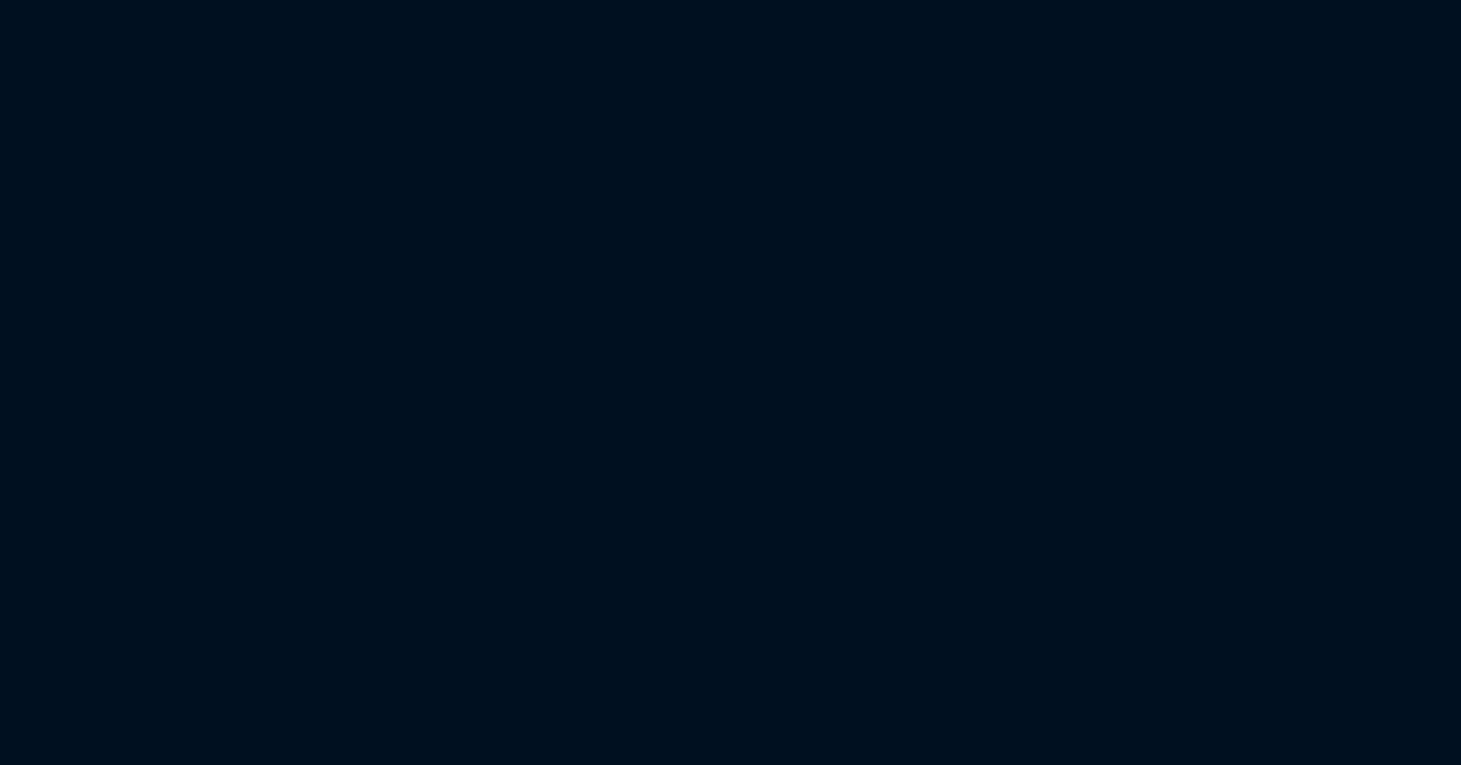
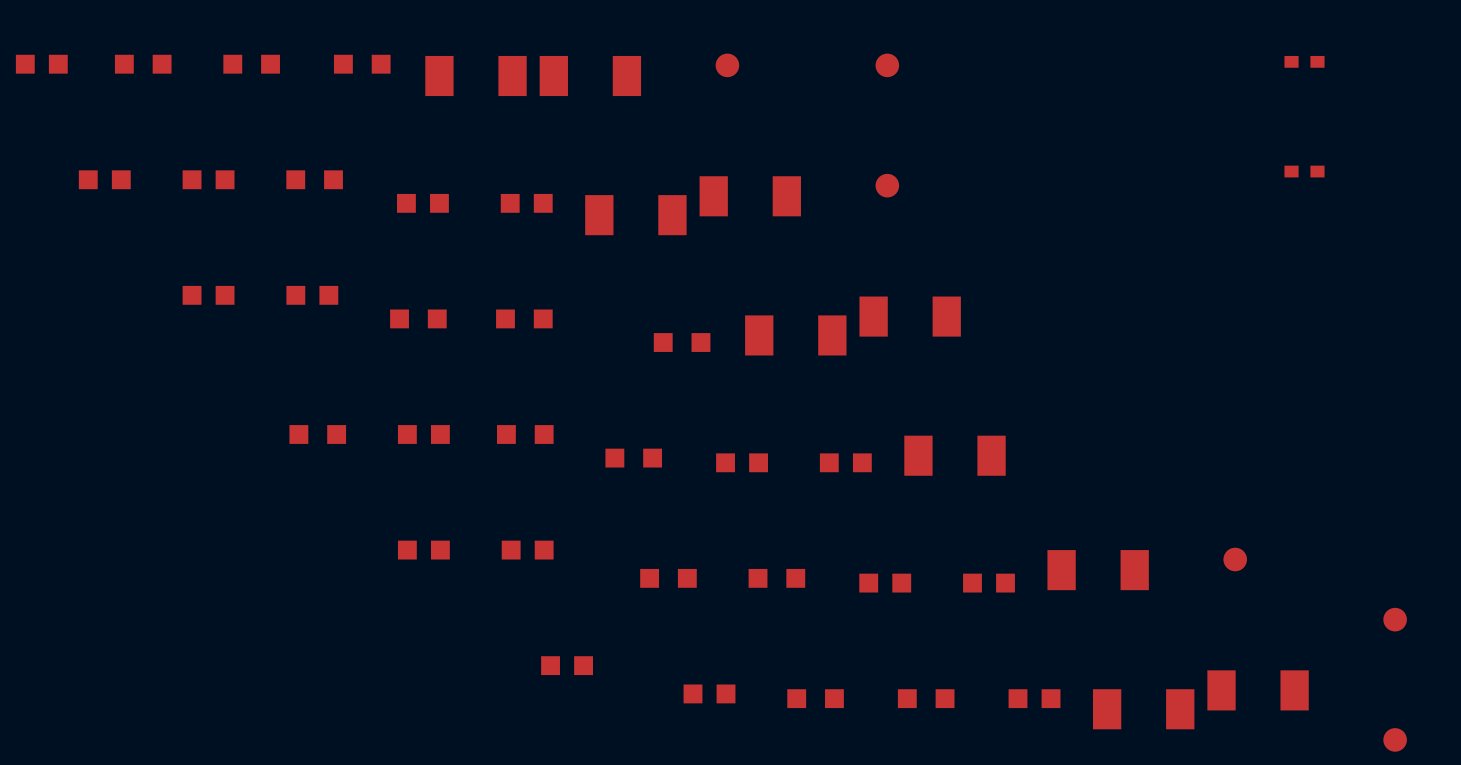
part: none -> (1304, 61)
part: none -> (41, 64)
part: none -> (143, 64)
part: none -> (251, 64)
part: none -> (362, 64)
part: none -> (727, 65)
part: none -> (887, 65)
part: none -> (475, 76)
part: none -> (590, 76)
part: none -> (1304, 171)
part: none -> (104, 179)
part: none -> (208, 179)
part: none -> (314, 179)
part: none -> (887, 185)
part: none -> (750, 196)
part: none -> (422, 203)
part: none -> (526, 203)
part: none -> (635, 215)
part: none -> (208, 295)
part: none -> (312, 295)
part: none -> (910, 316)
part: none -> (418, 318)
part: none -> (524, 318)
part: none -> (795, 335)
part: none -> (682, 342)
part: none -> (317, 434)
part: none -> (423, 434)
part: none -> (525, 434)
part: none -> (955, 455)
part: none -> (633, 458)
part: none -> (742, 462)
part: none -> (845, 462)
part: none -> (423, 550)
part: none -> (527, 550)
part: none -> (1235, 559)
part: none -> (1098, 570)
part: none -> (668, 578)
part: none -> (776, 578)
part: none -> (885, 583)
part: none -> (988, 583)
part: none -> (1395, 619)
part: none -> (567, 665)
part: none -> (1258, 690)
part: none -> (709, 693)
part: none -> (815, 698)
part: none -> (926, 698)
part: none -> (1034, 698)
part: none -> (1143, 709)
part: none -> (1395, 739)

